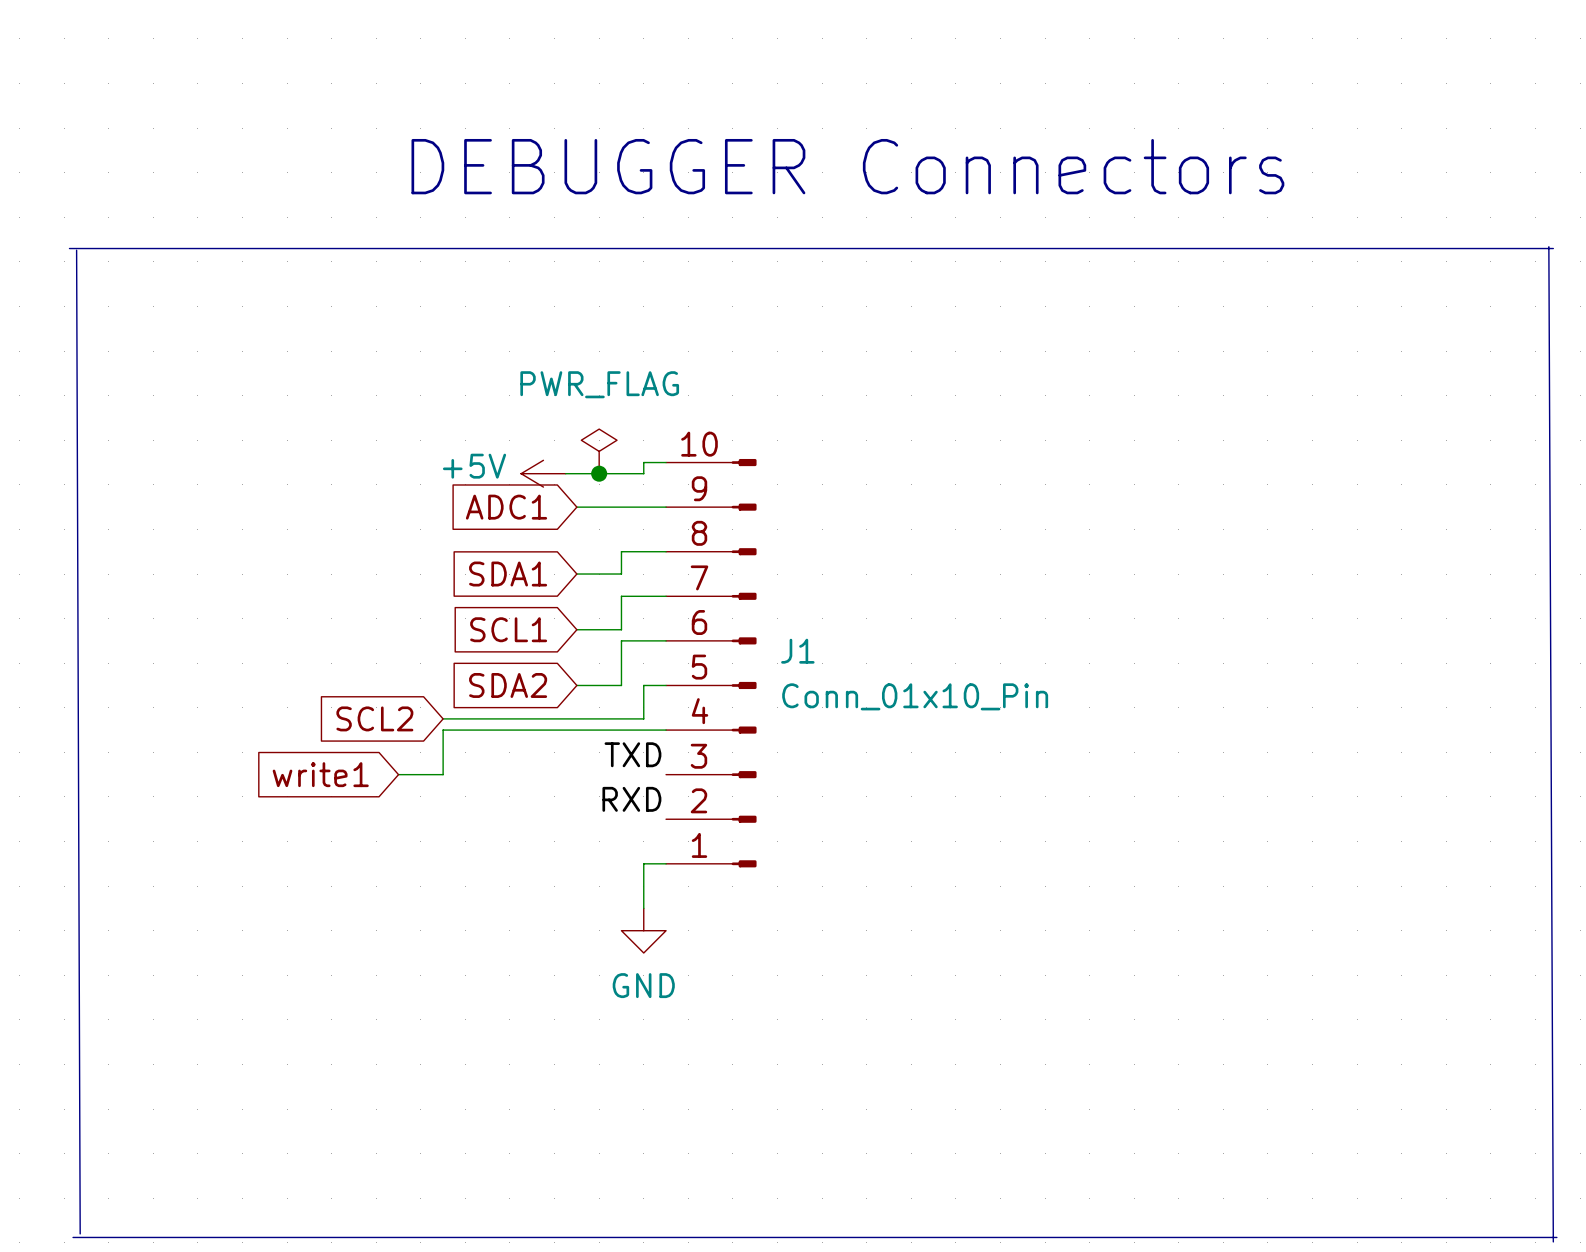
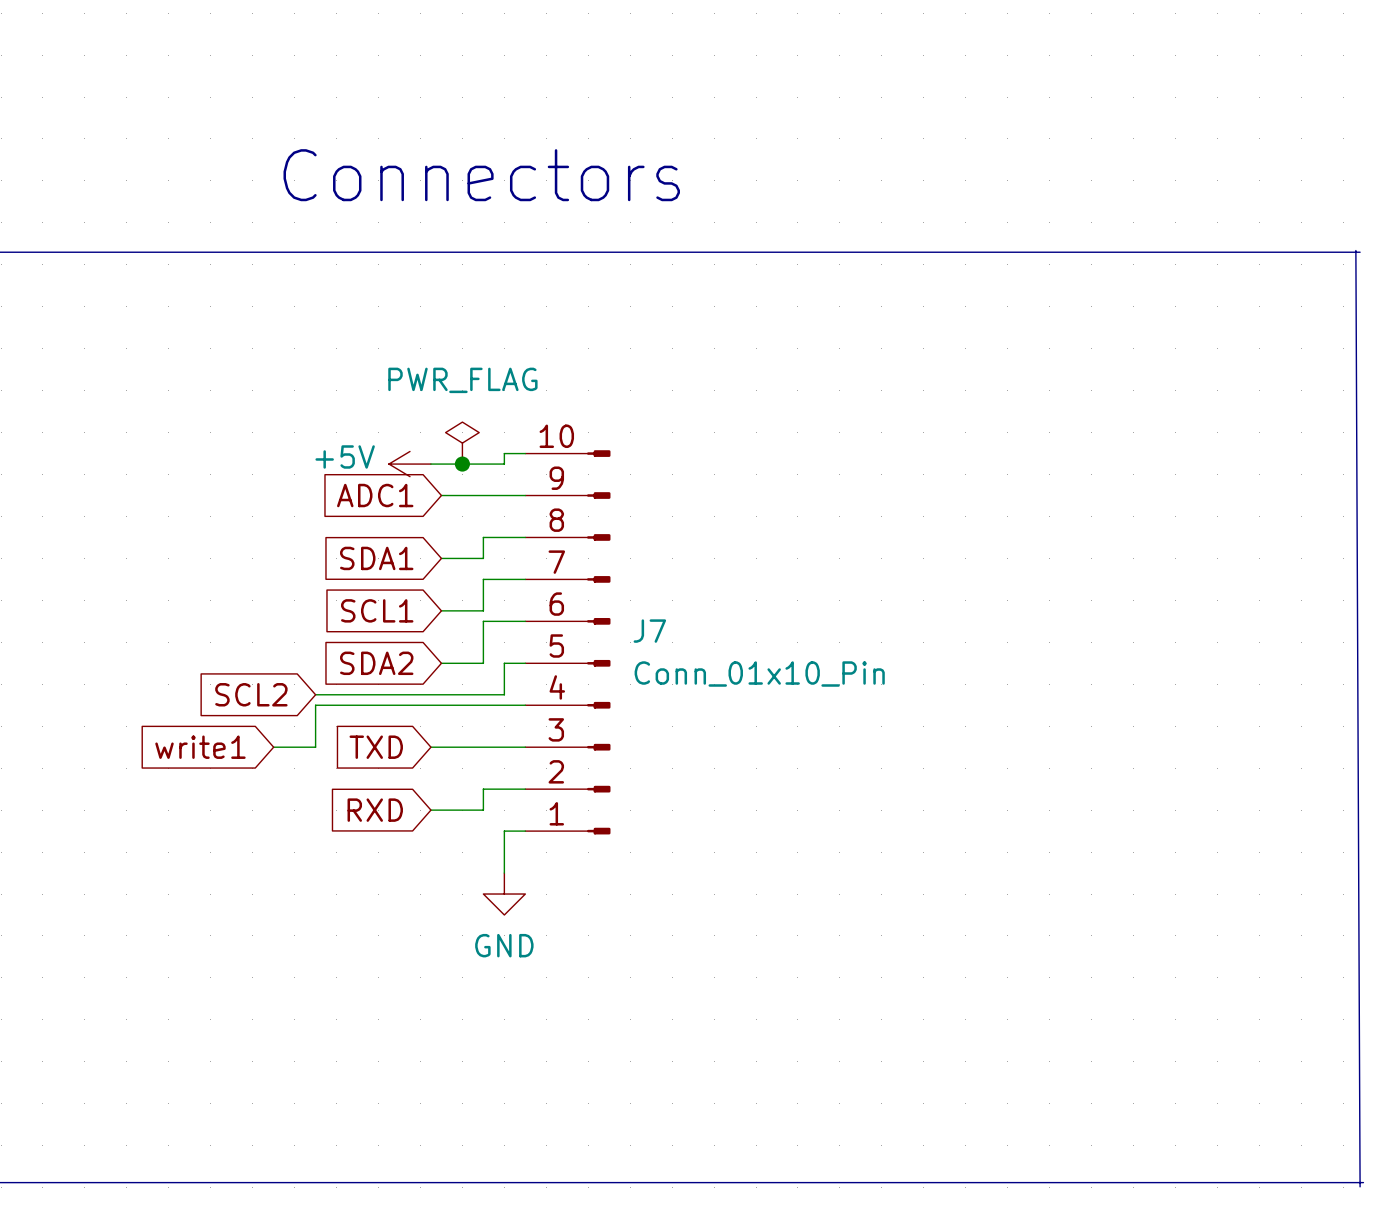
text: DEBUGGER Connectors (847, 166) -> Connectors (481, 175)
J1 name: J1 (797, 651) -> J7 (649, 631)
label: TXD (632, 754) -> none
global label: none -> TXD (376, 747)
wire: none -> (430, 747) (525, 747)
label: RXD (631, 799) -> none
wire: none -> (525, 789) (483, 789) (483, 810) (430, 810)
global label: none -> RXD (375, 810)

